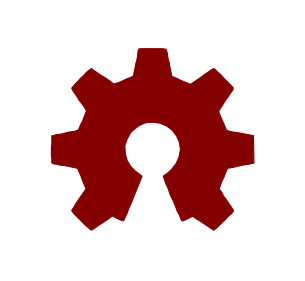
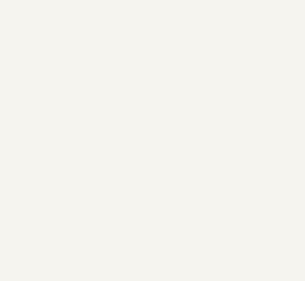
power symbol: (152, 139) -> none

